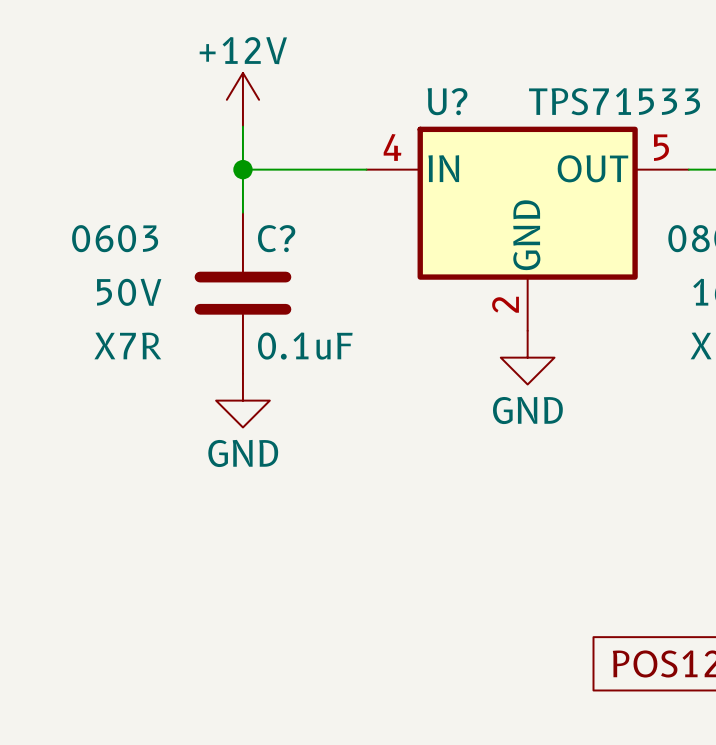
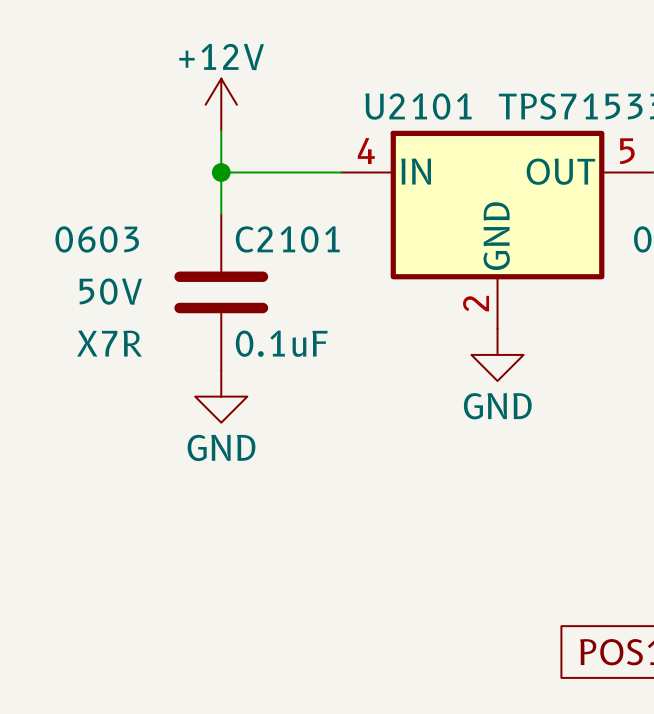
U? name: U? (447, 101) -> U2101 (418, 106)
C? name: C? (276, 238) -> C2101 (287, 239)

